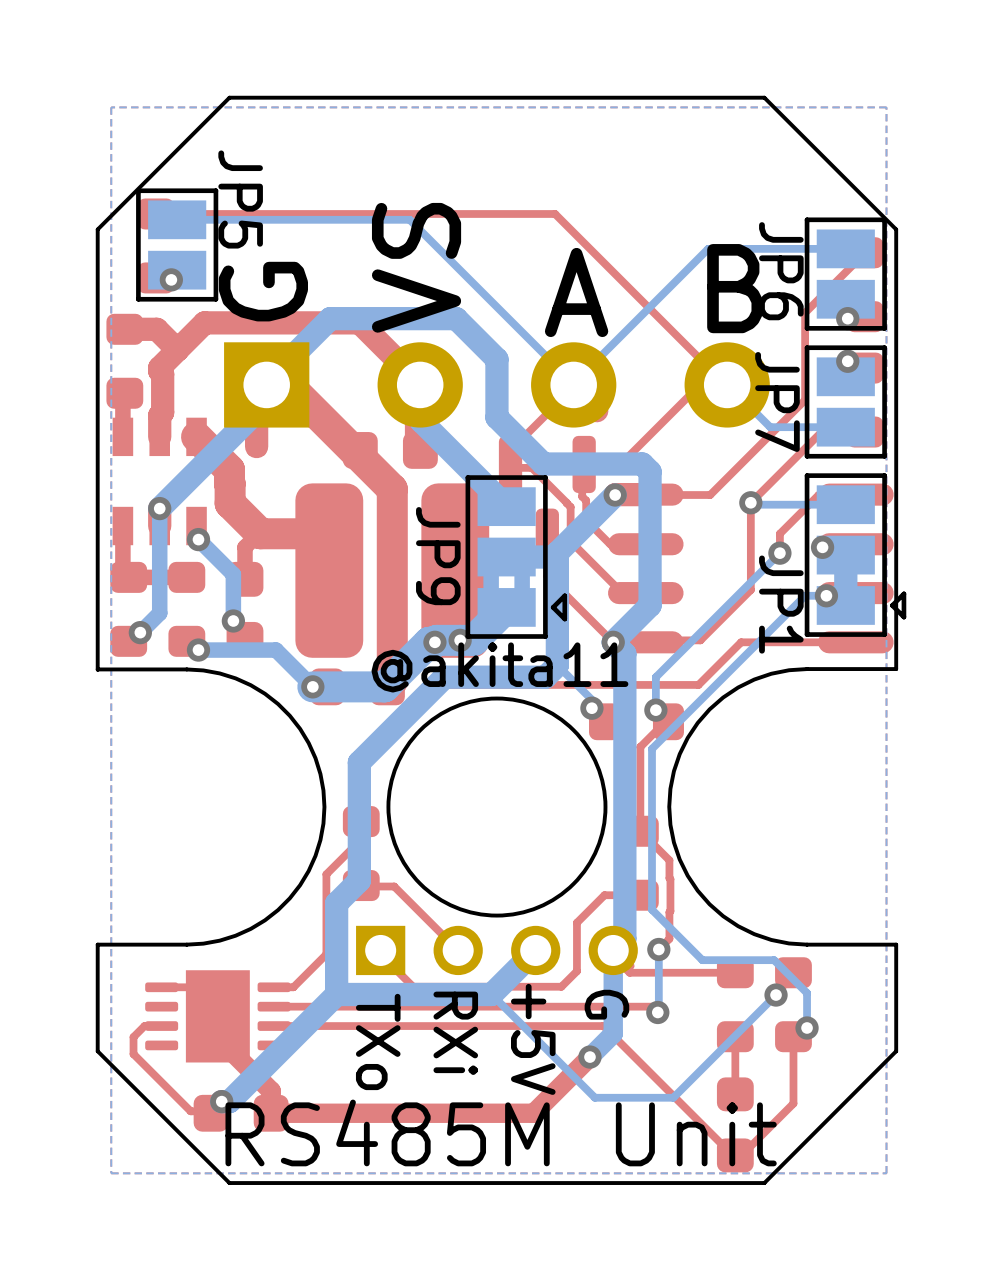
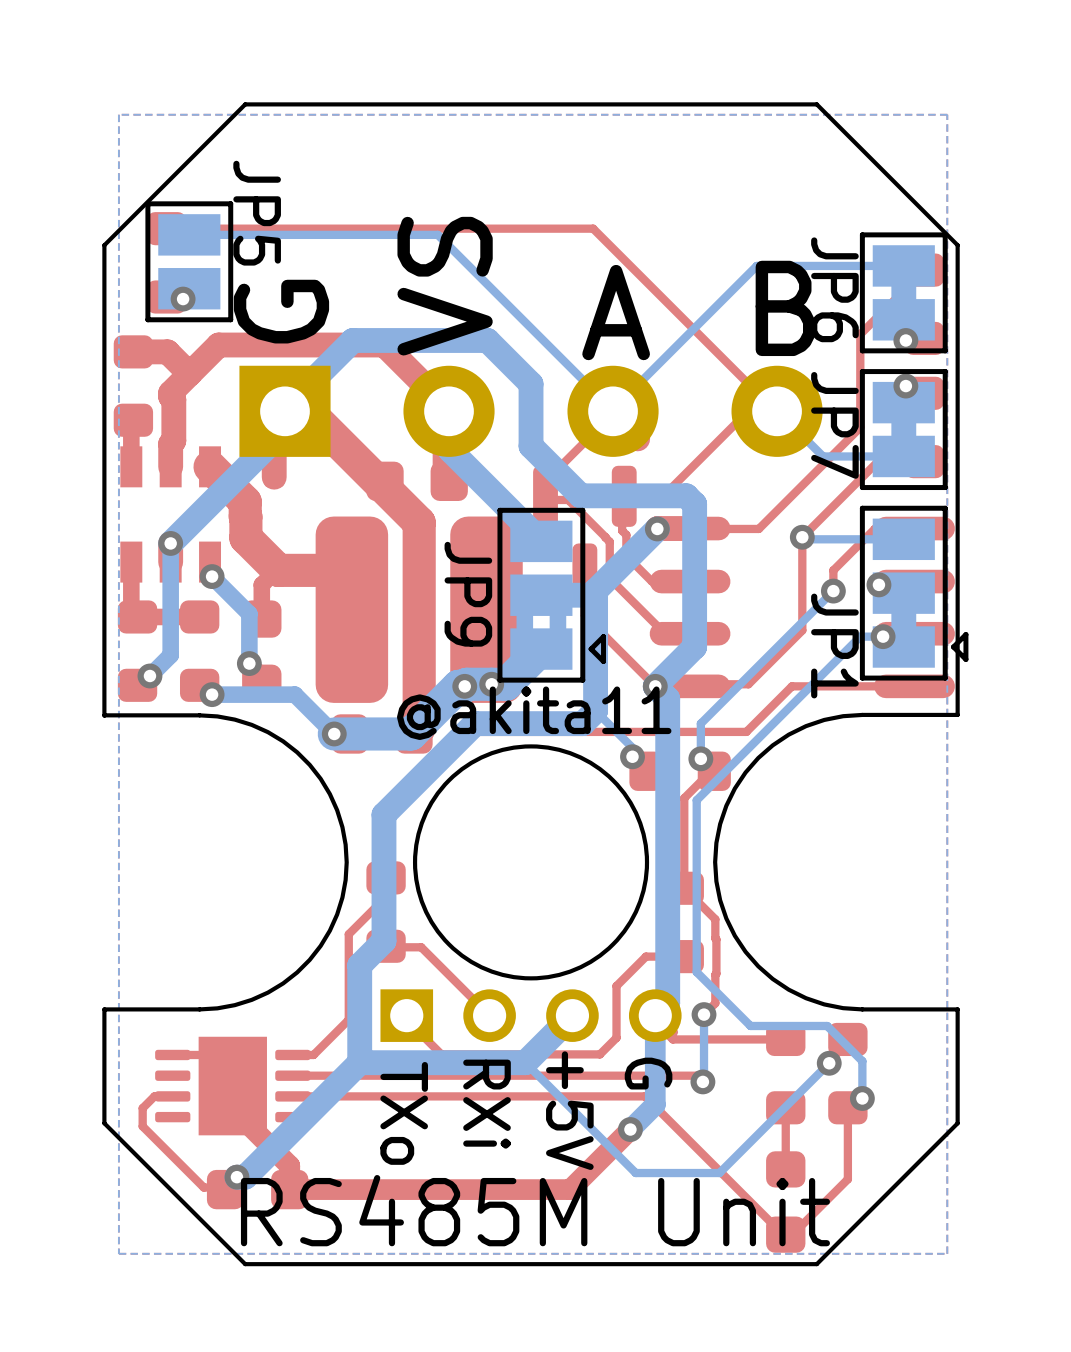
JP6 footprint: [804, 217, 887, 331] -> [859, 232, 948, 354]
JP7 footprint: [804, 345, 887, 459] -> [859, 369, 948, 491]

